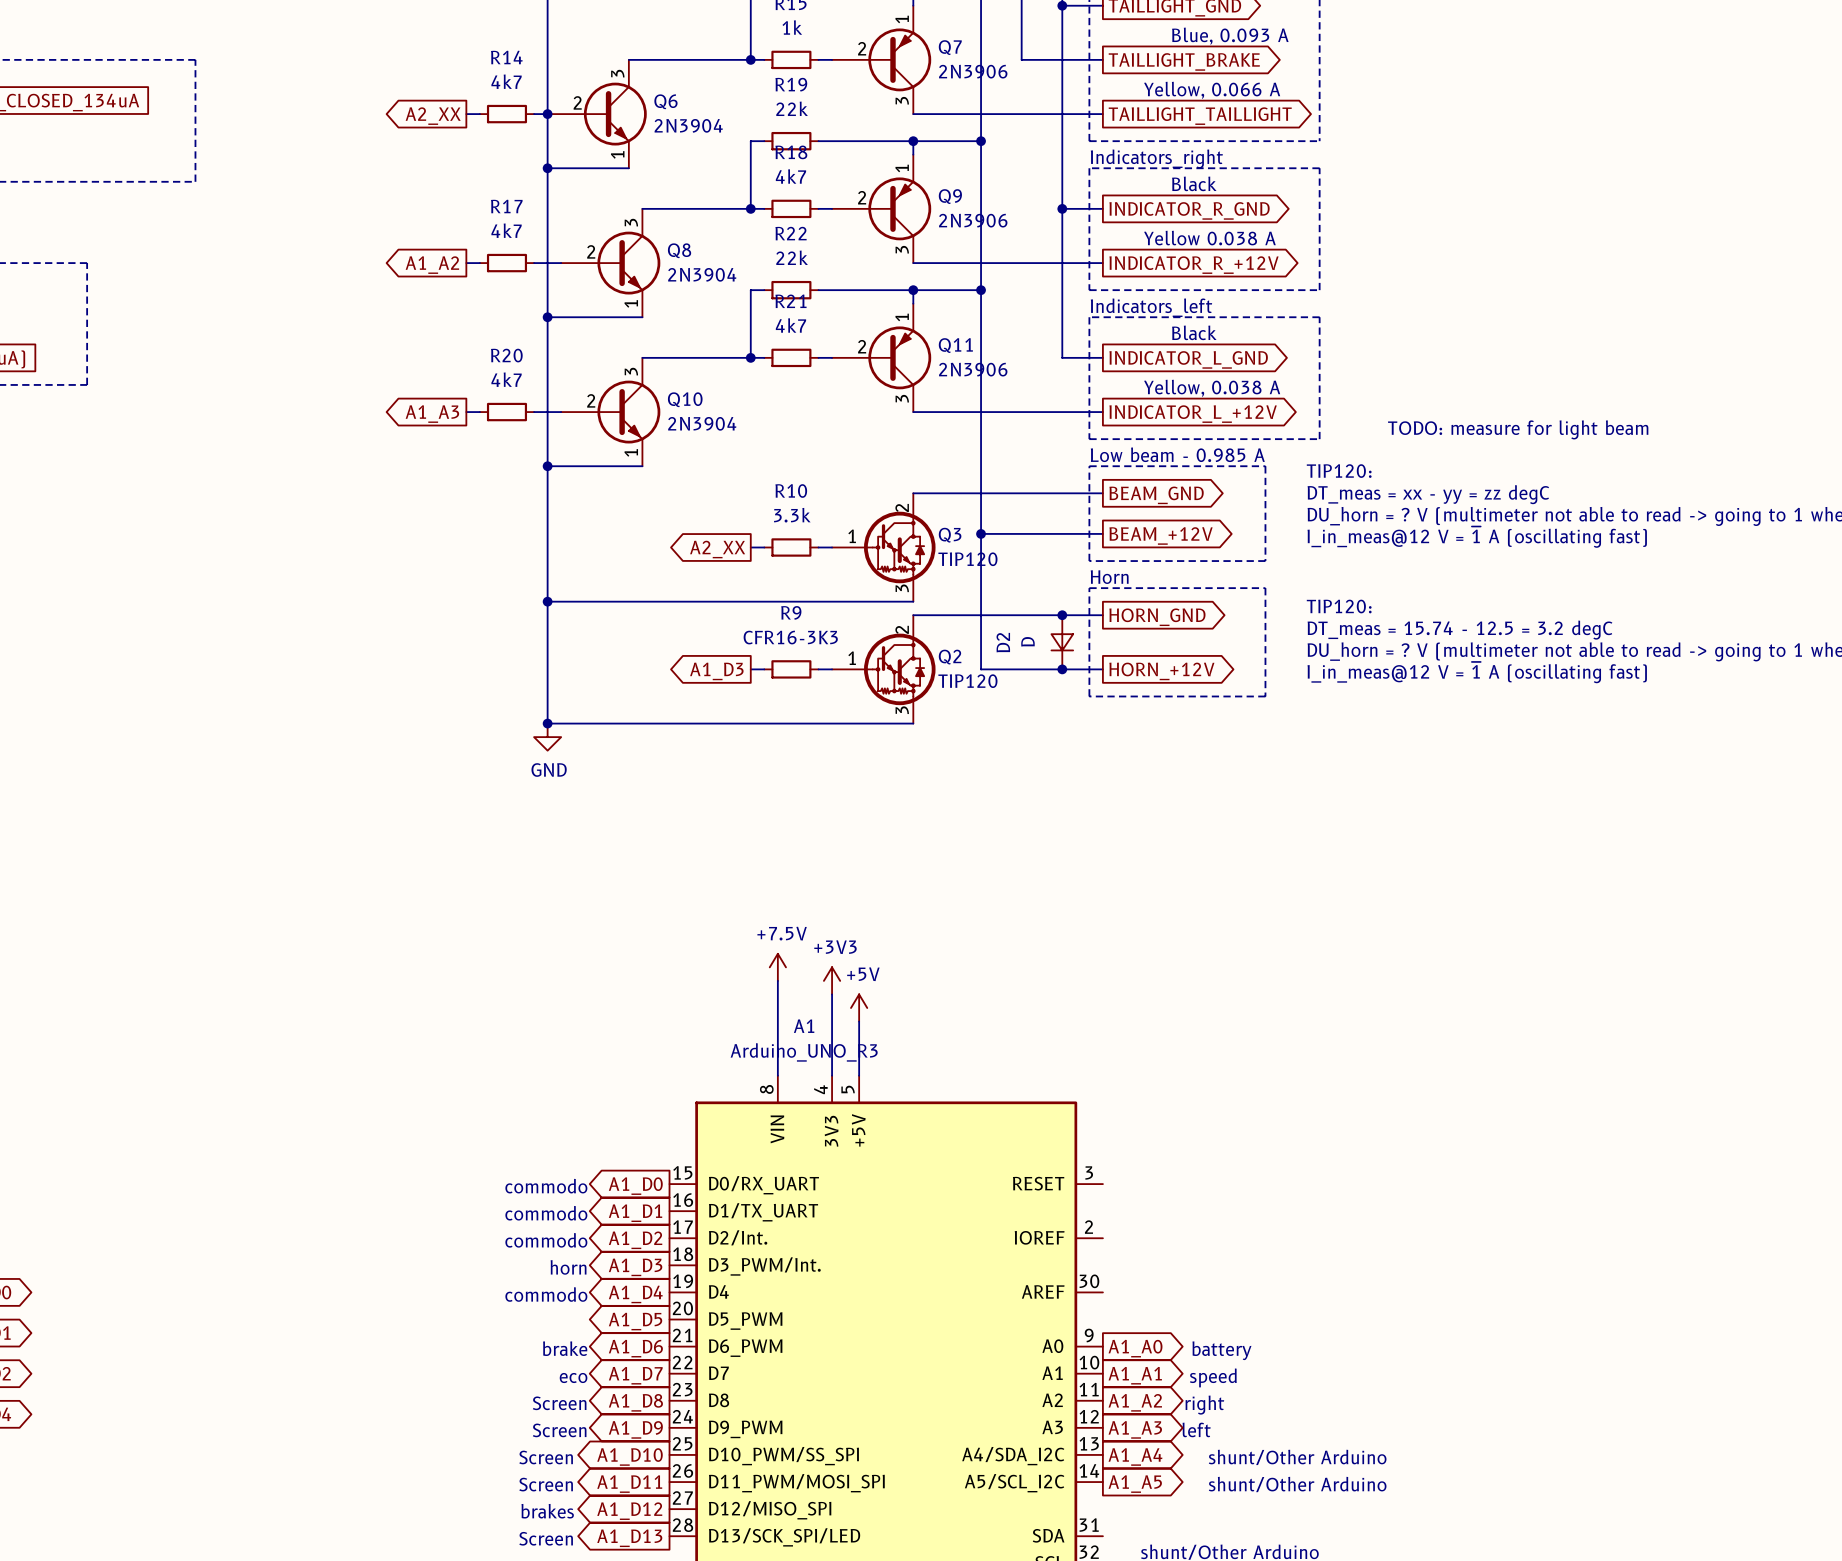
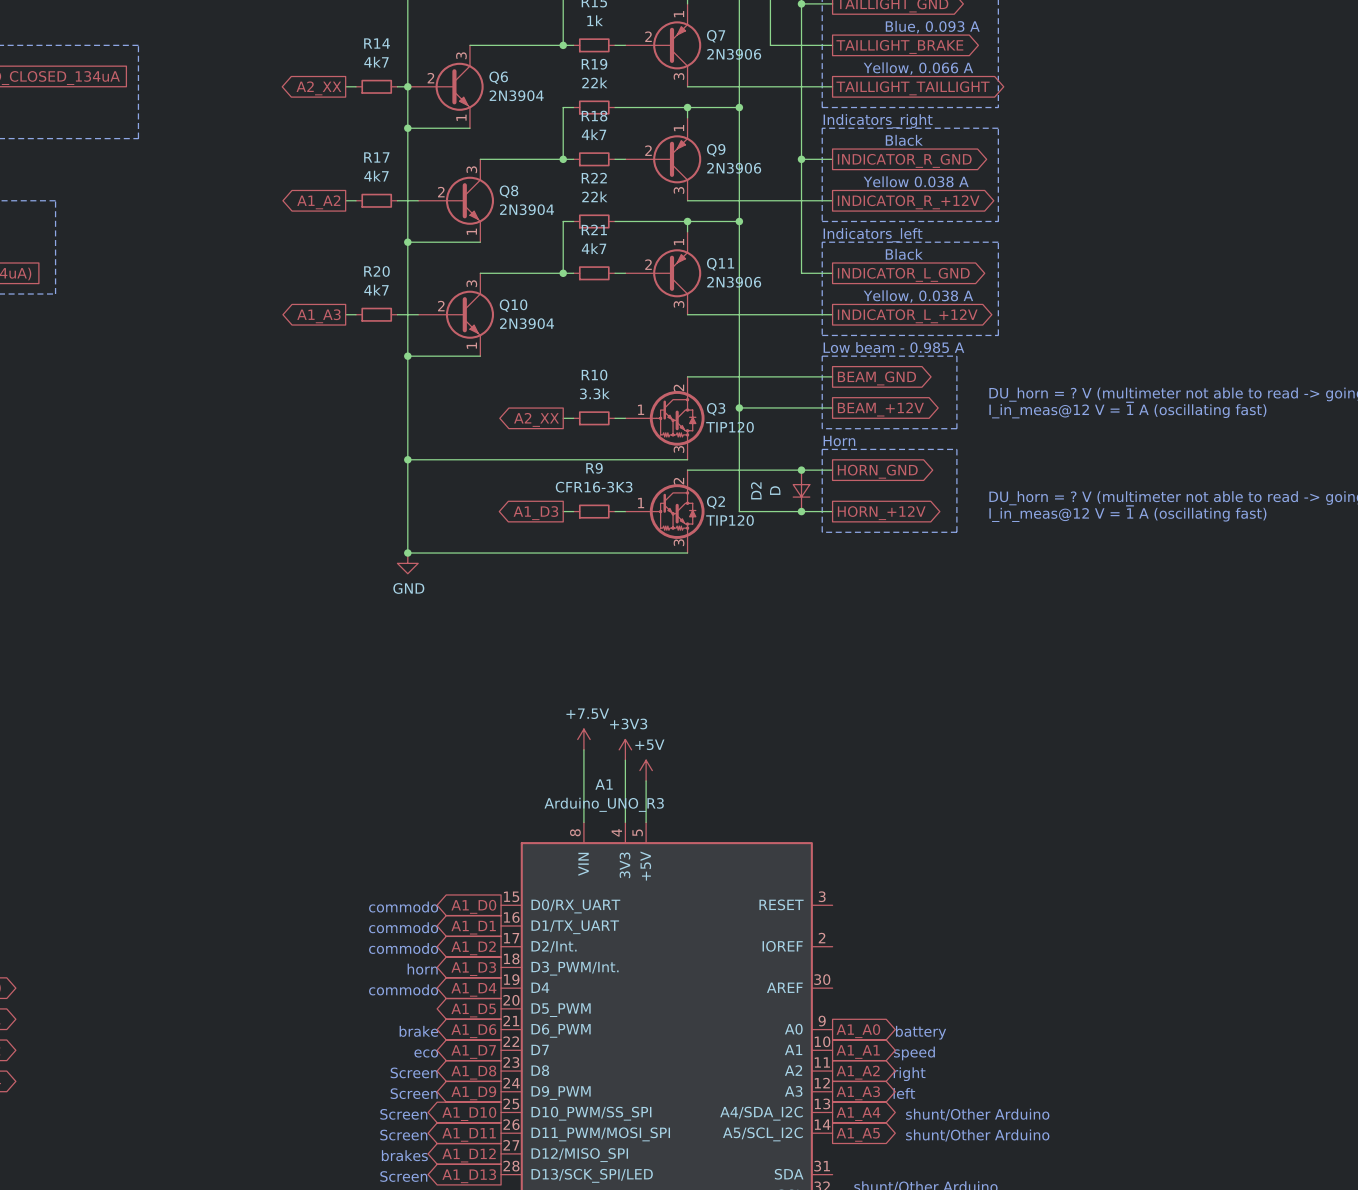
text: TODO: measure for light beam (1518, 429) -> none
text: TIP120: (1339, 471) -> none
text: DT_meas = xx - yy = zz degC (1428, 494) -> none
text: TIP120: (1339, 606) -> none
text: DT_meas = 15.74 - 12.5 = 3.2 degC (1459, 630) -> none

